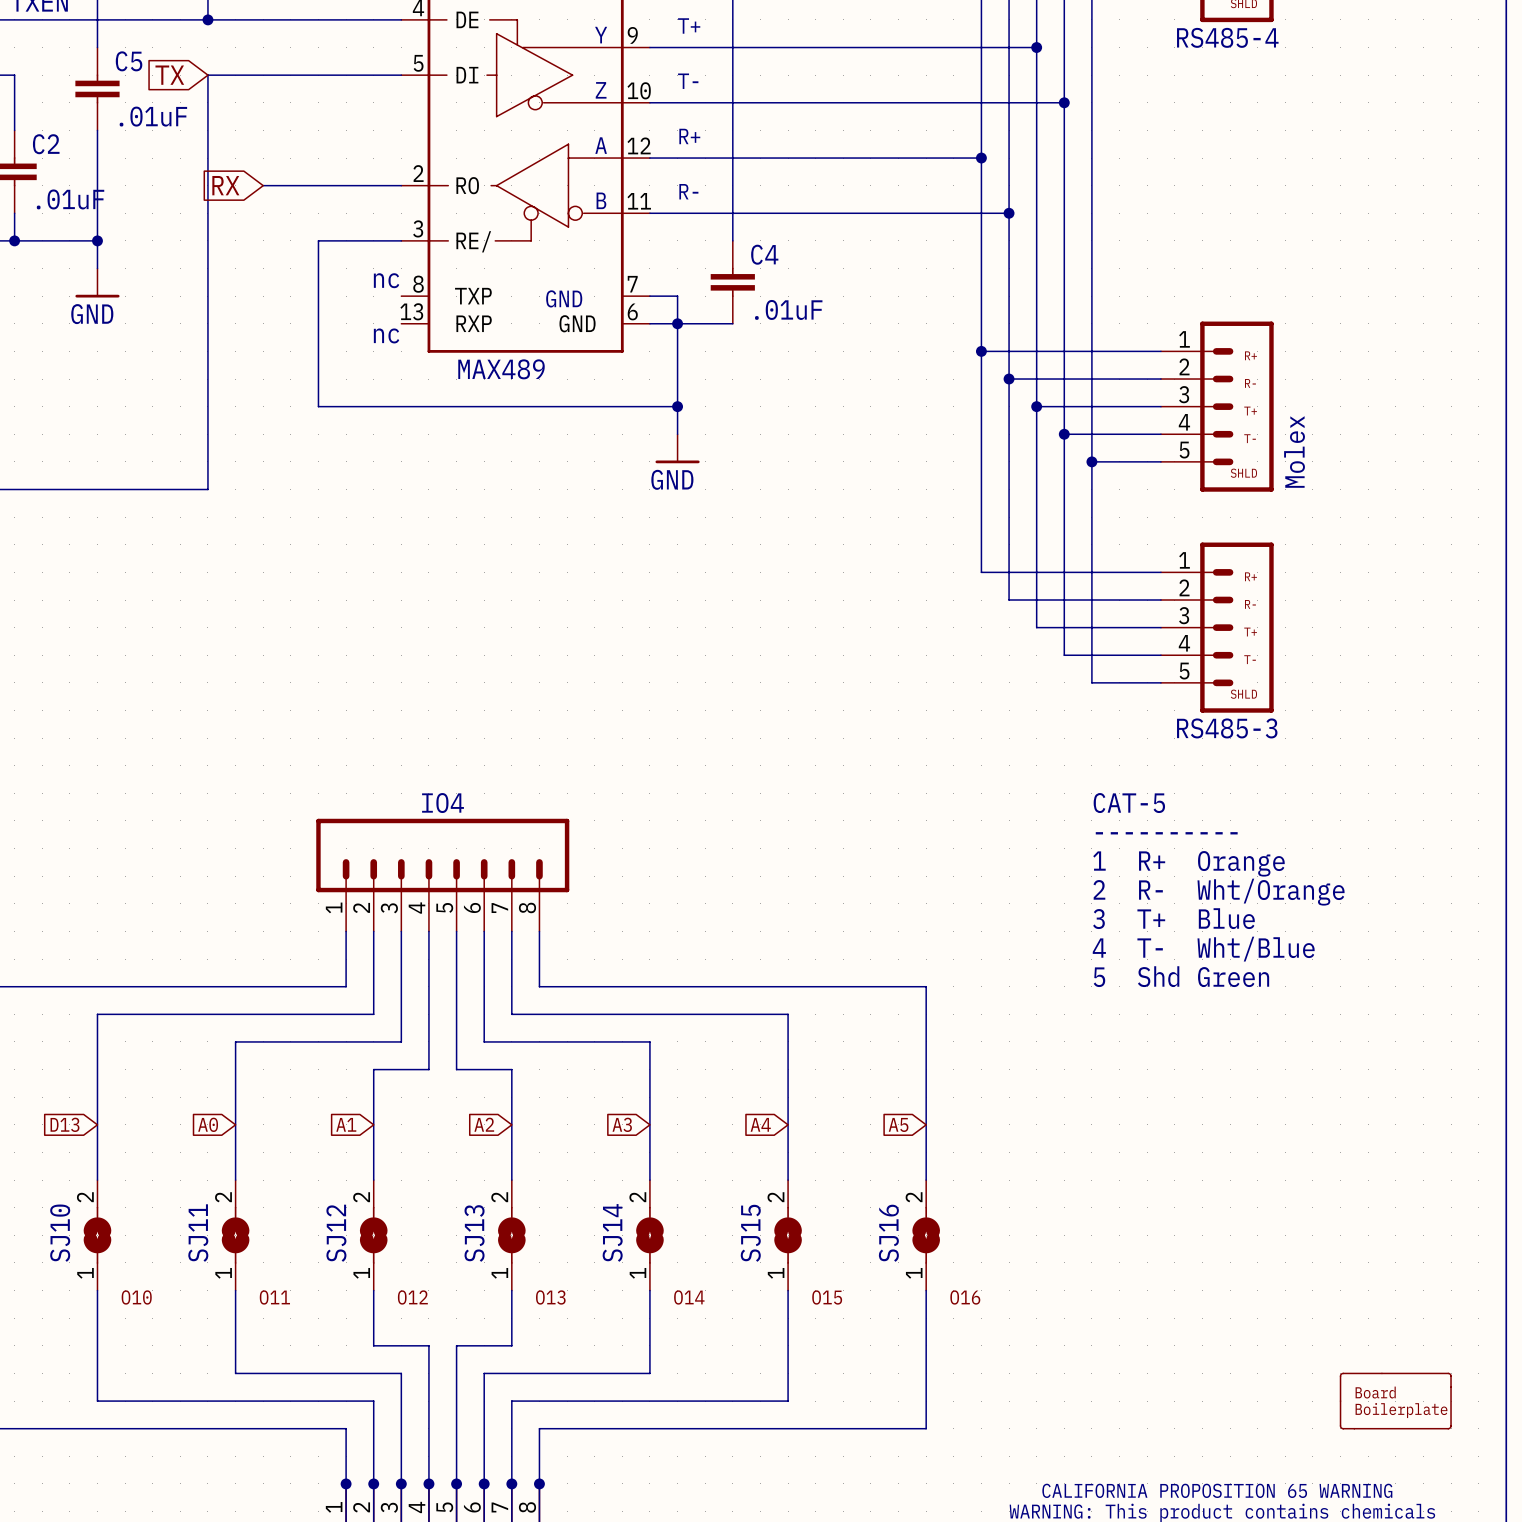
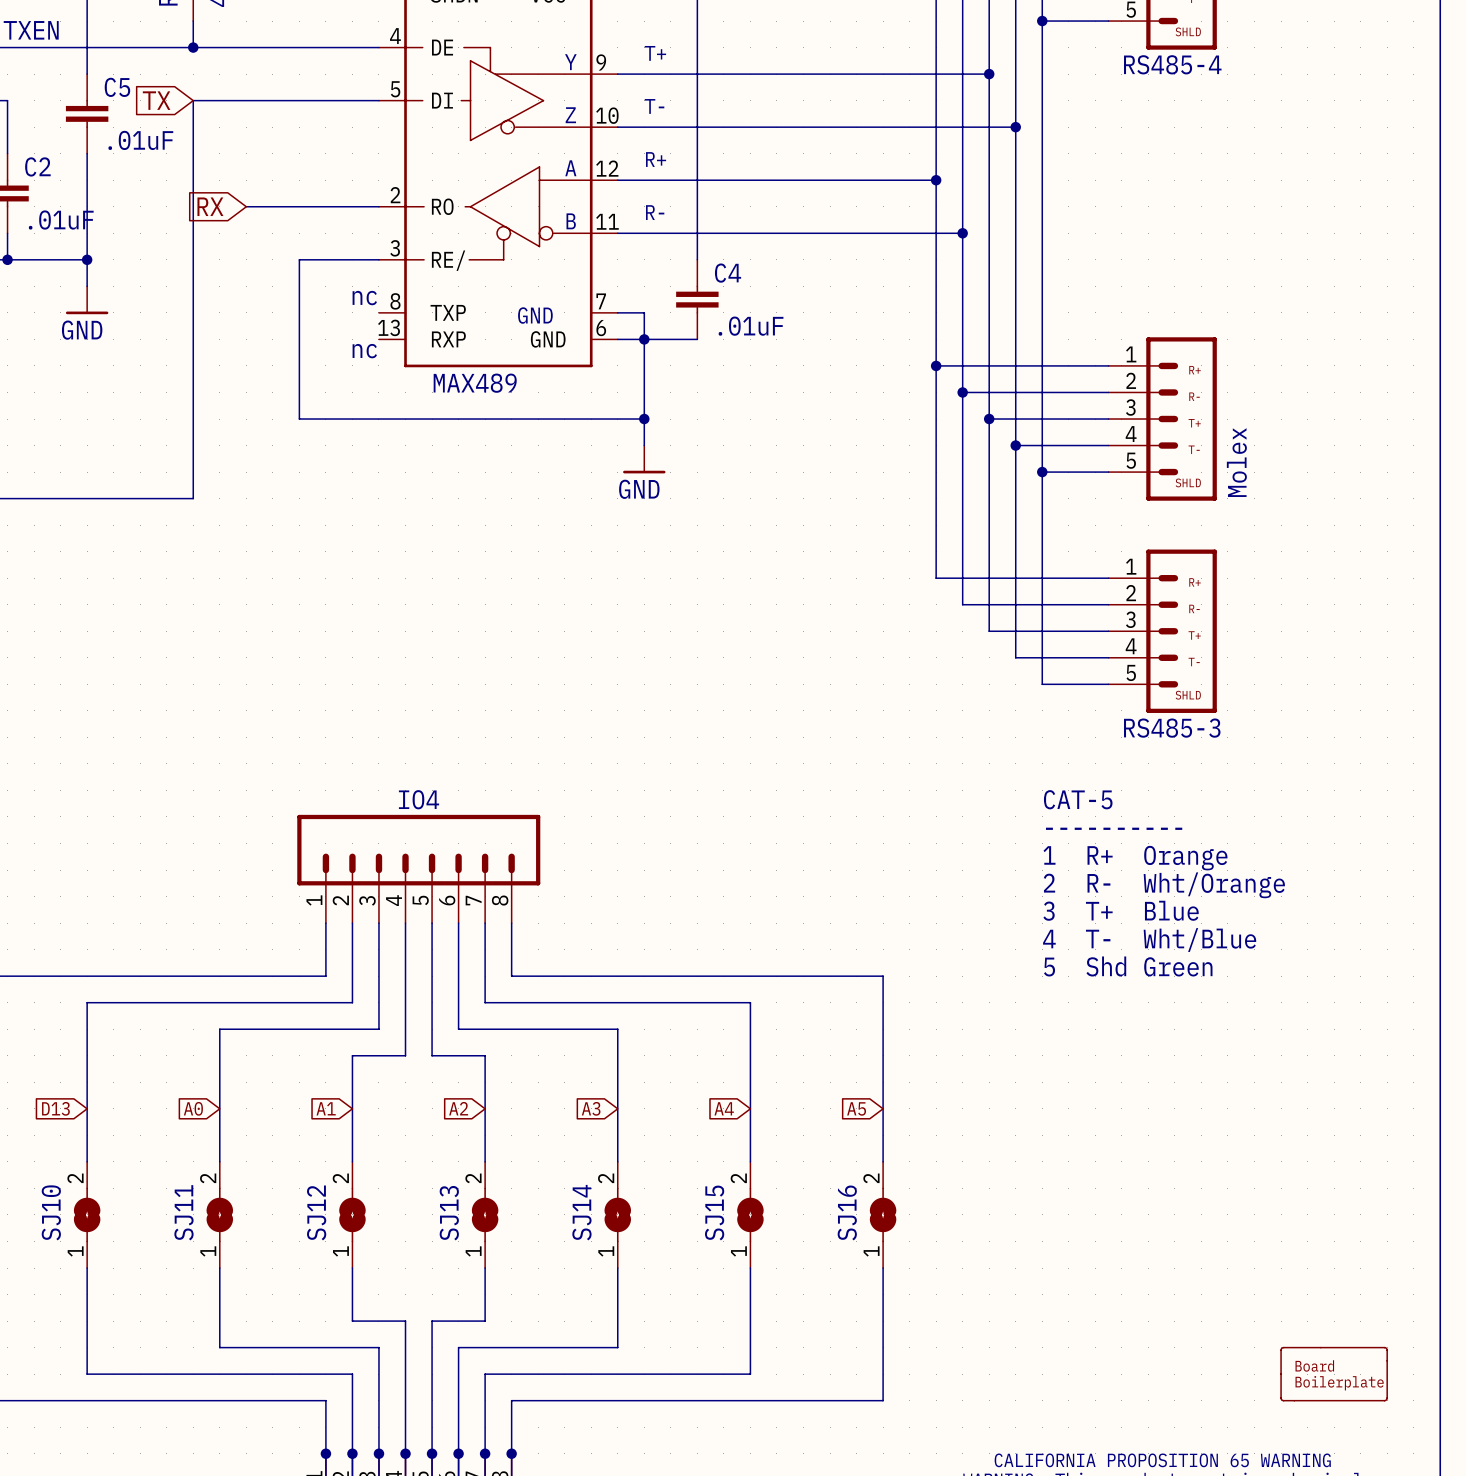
label: O10 (136, 1297) -> none
label: O11 (274, 1297) -> none
label: O12 (412, 1297) -> none
label: O13 (550, 1297) -> none
label: O14 (689, 1297) -> none
label: O15 (827, 1297) -> none
label: O16 (965, 1297) -> none

